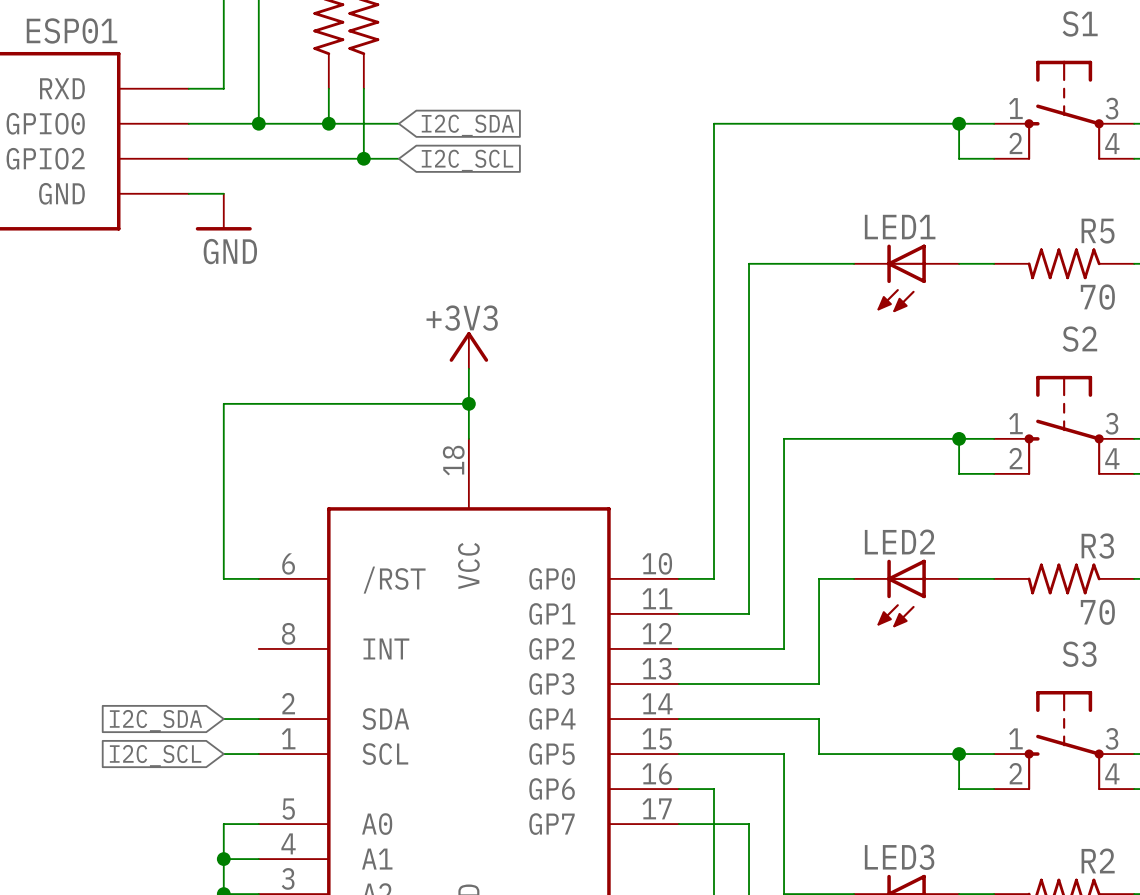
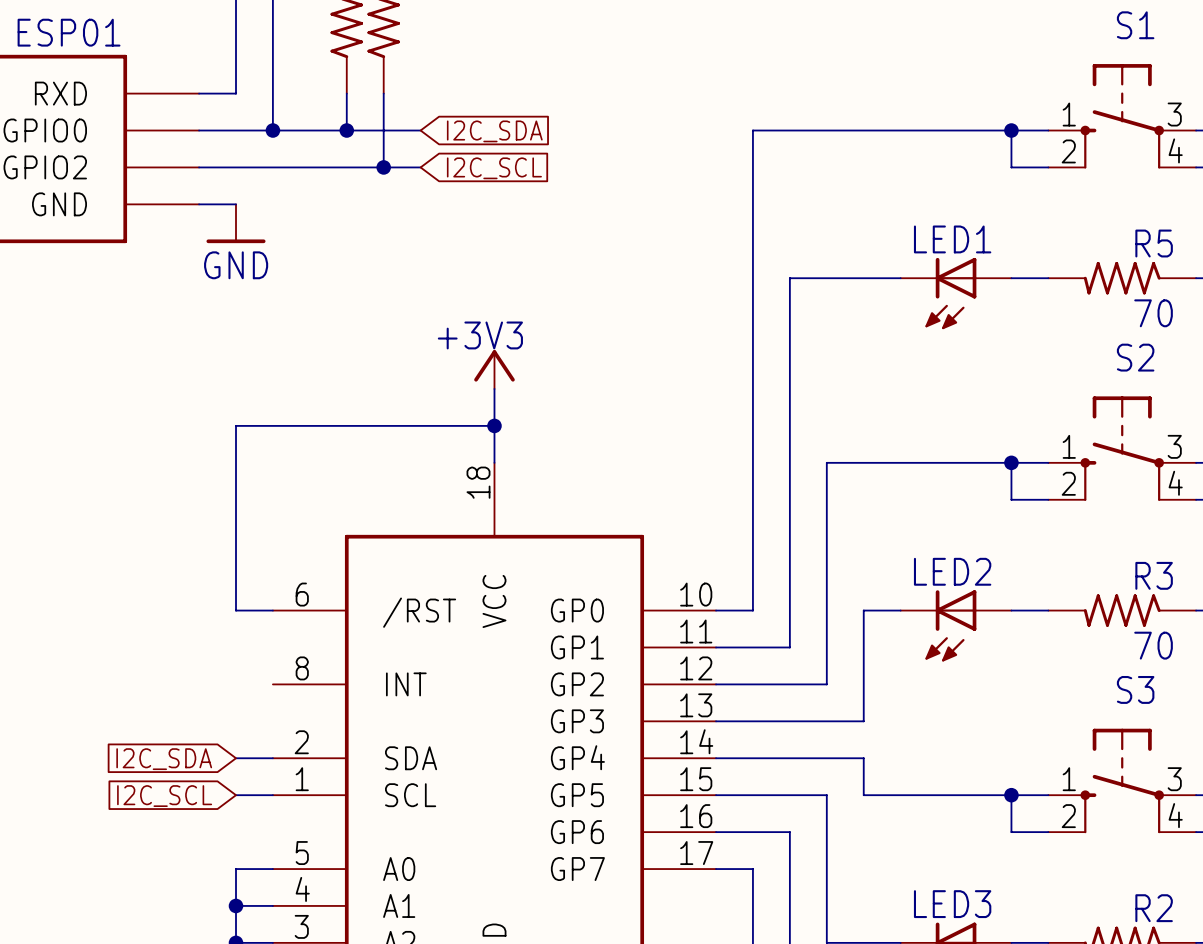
wire: (713, 789) (713, 824) (749, 824) -> (752, 832) (789, 832) (789, 869)

